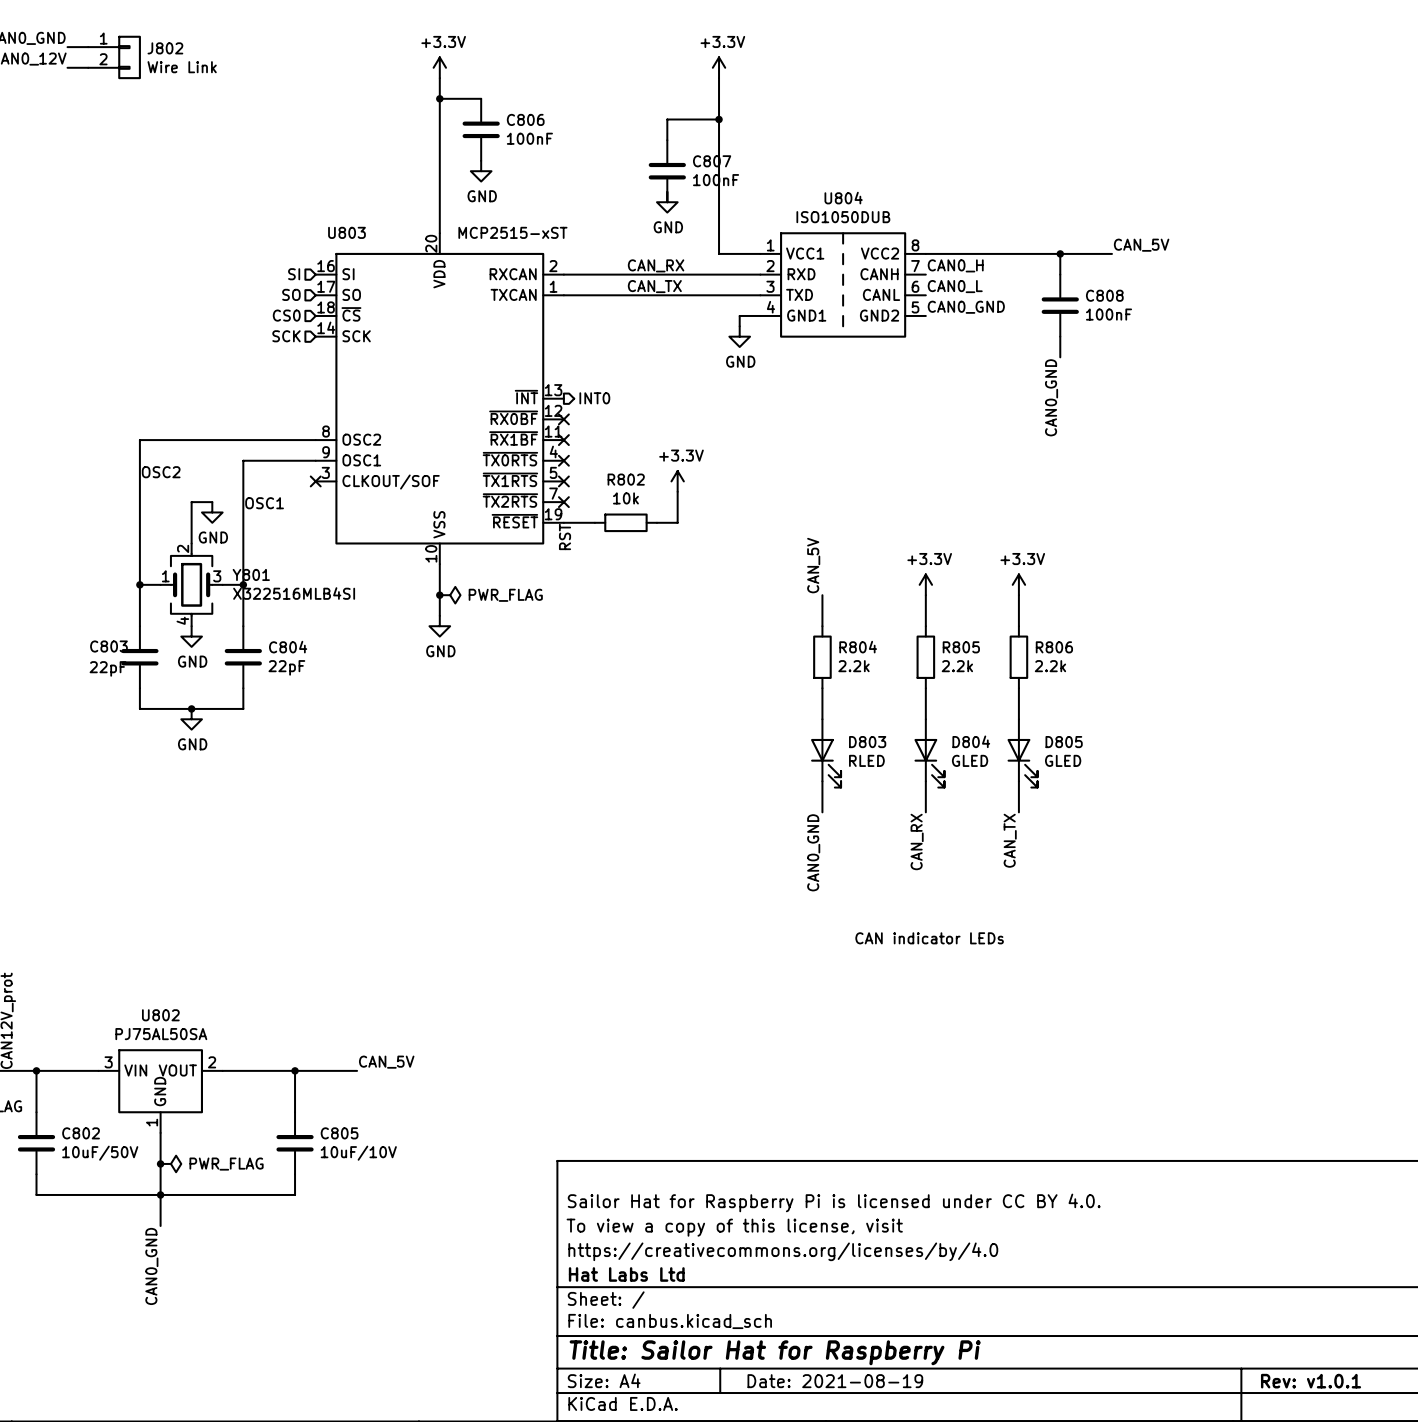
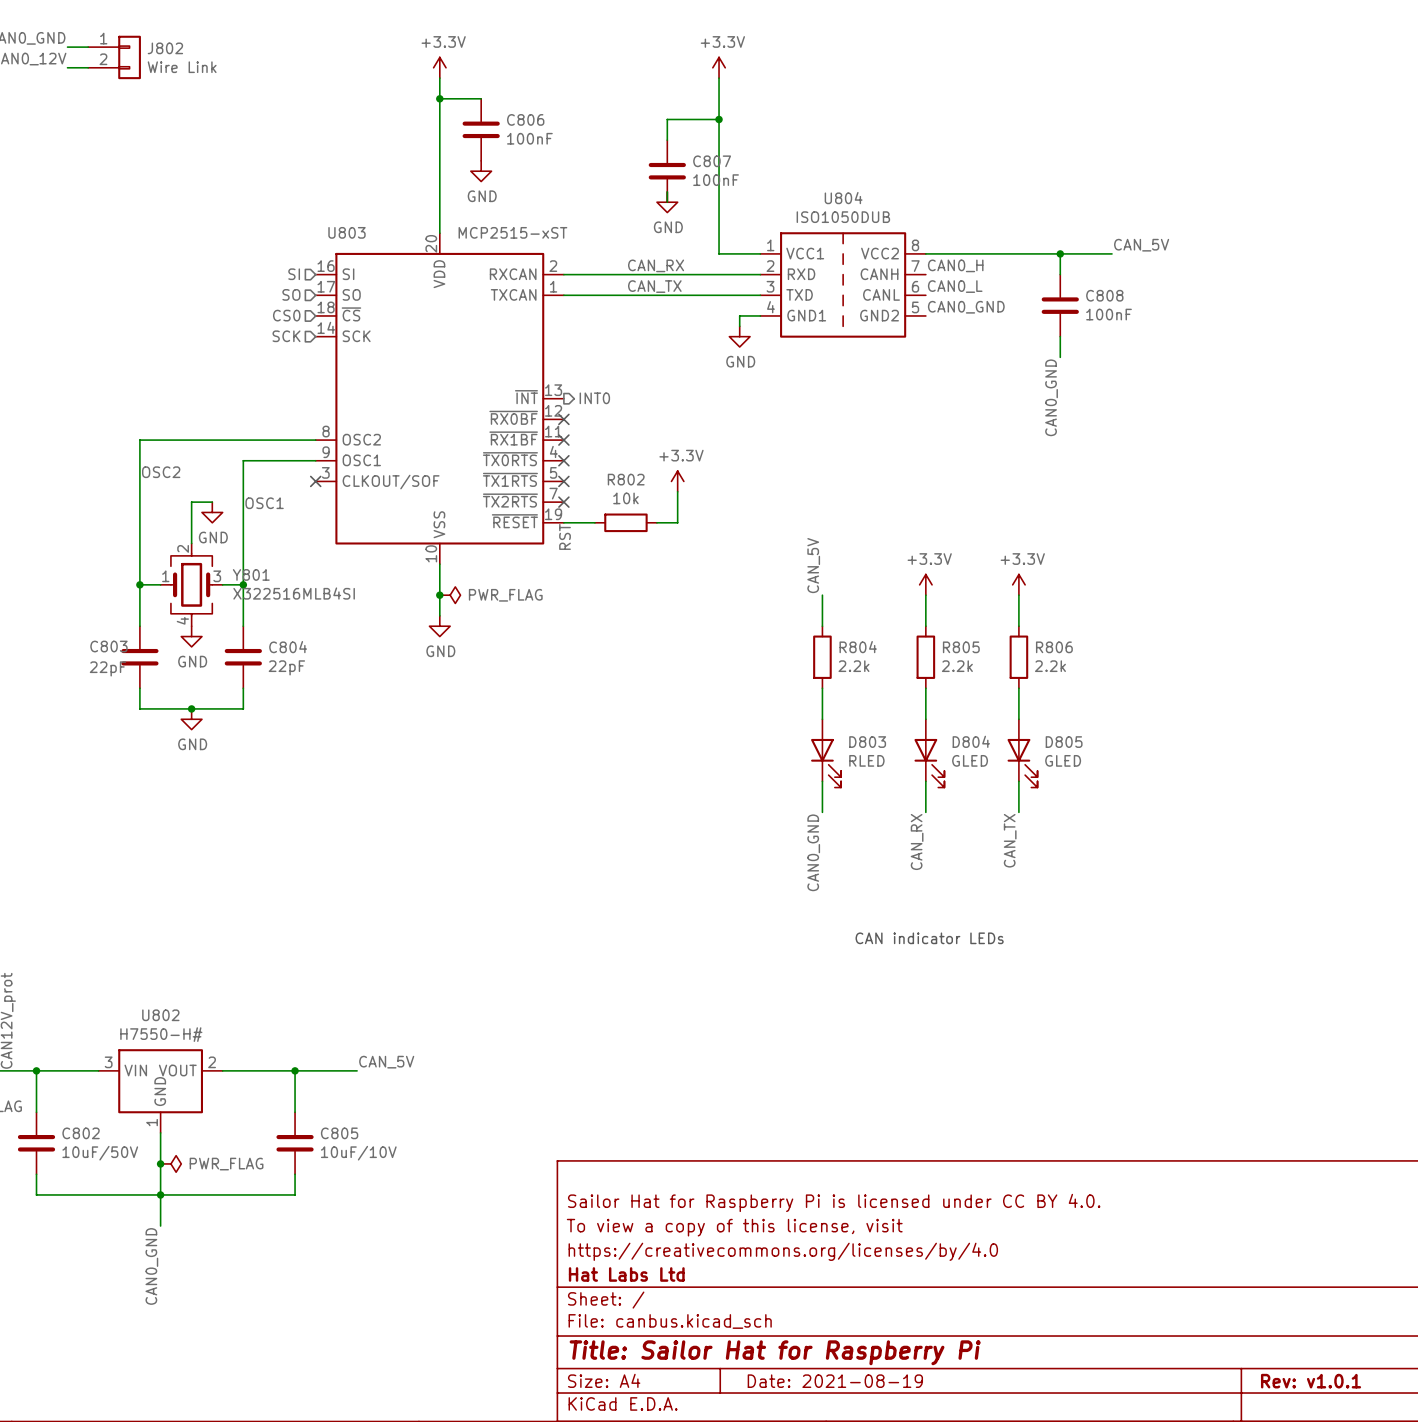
U802 value: PJ75AL50SA (161, 1034) -> H7550-H# (161, 1034)

